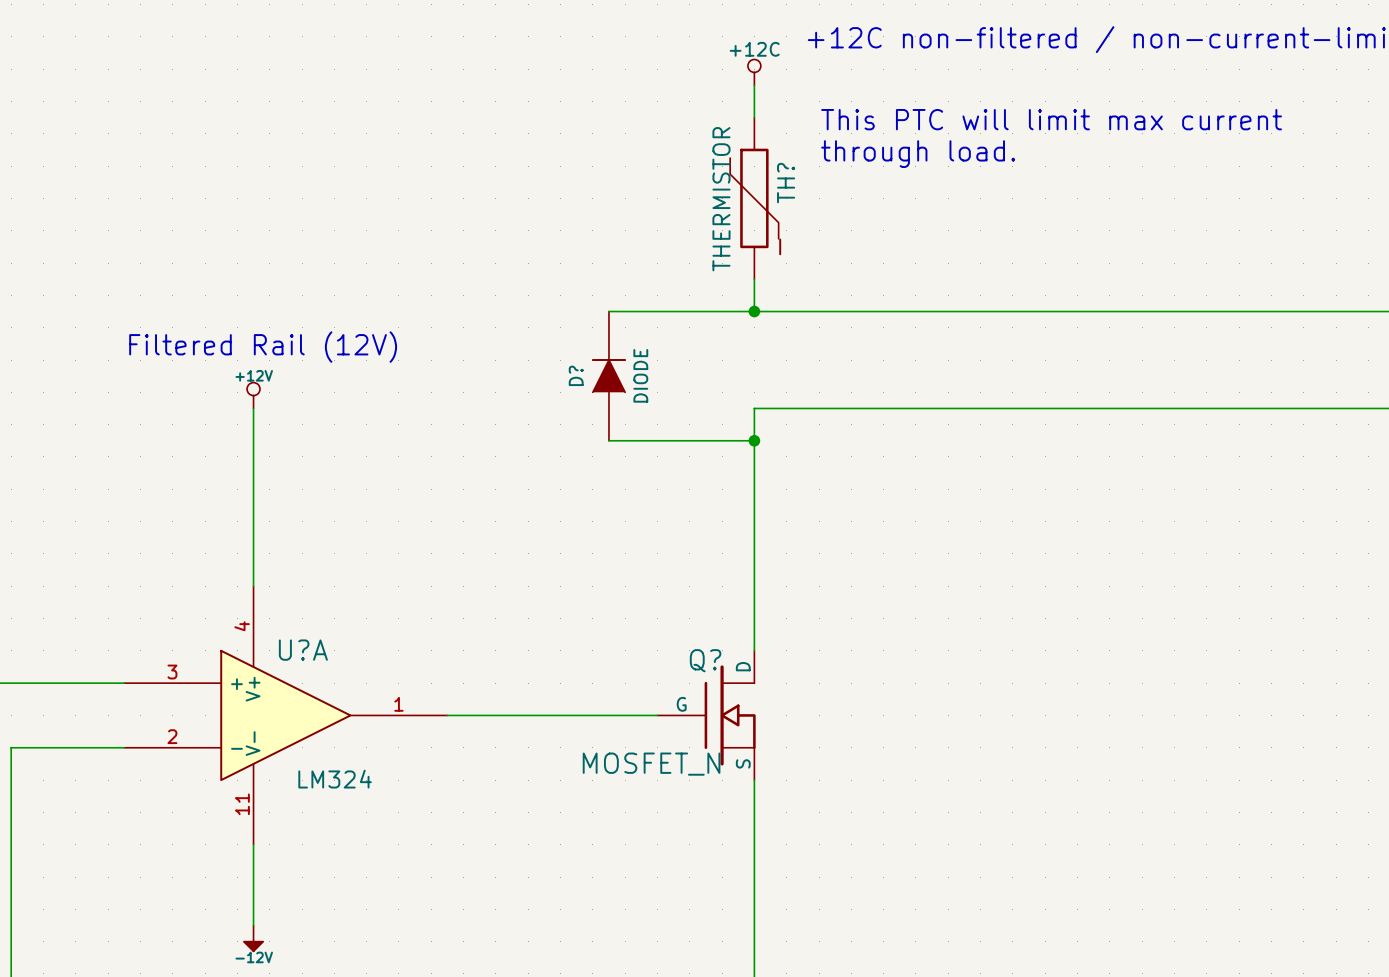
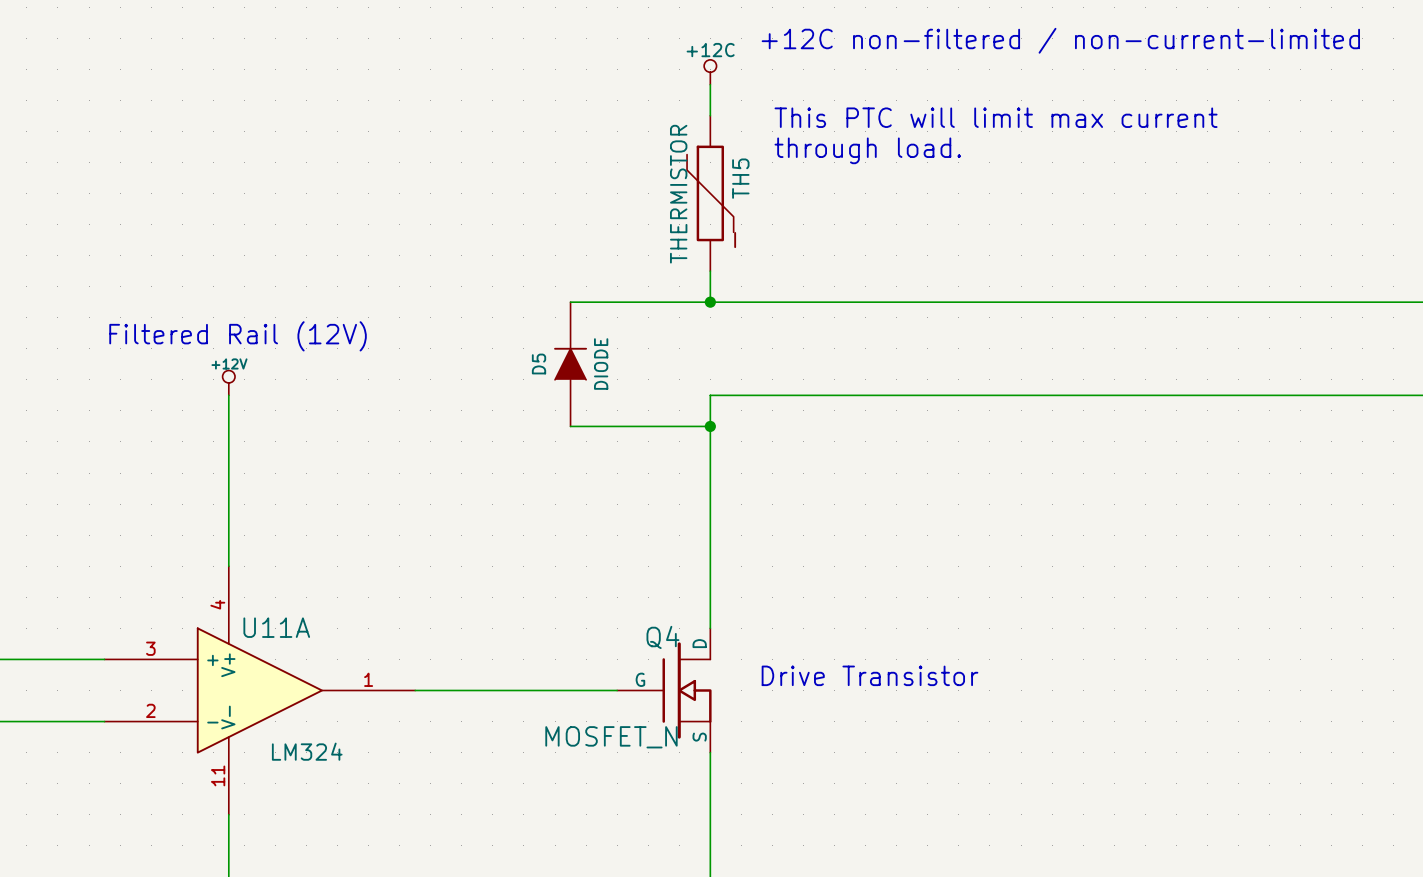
TH? name: TH? (786, 183) -> TH5 (740, 178)
D? name: D? (576, 375) -> D5 (539, 364)
U?A name: U?A (303, 650) -> U11A (276, 627)
Q? name: Q? (705, 660) -> Q4 (662, 637)
text: none -> Drive Transistor (870, 675)

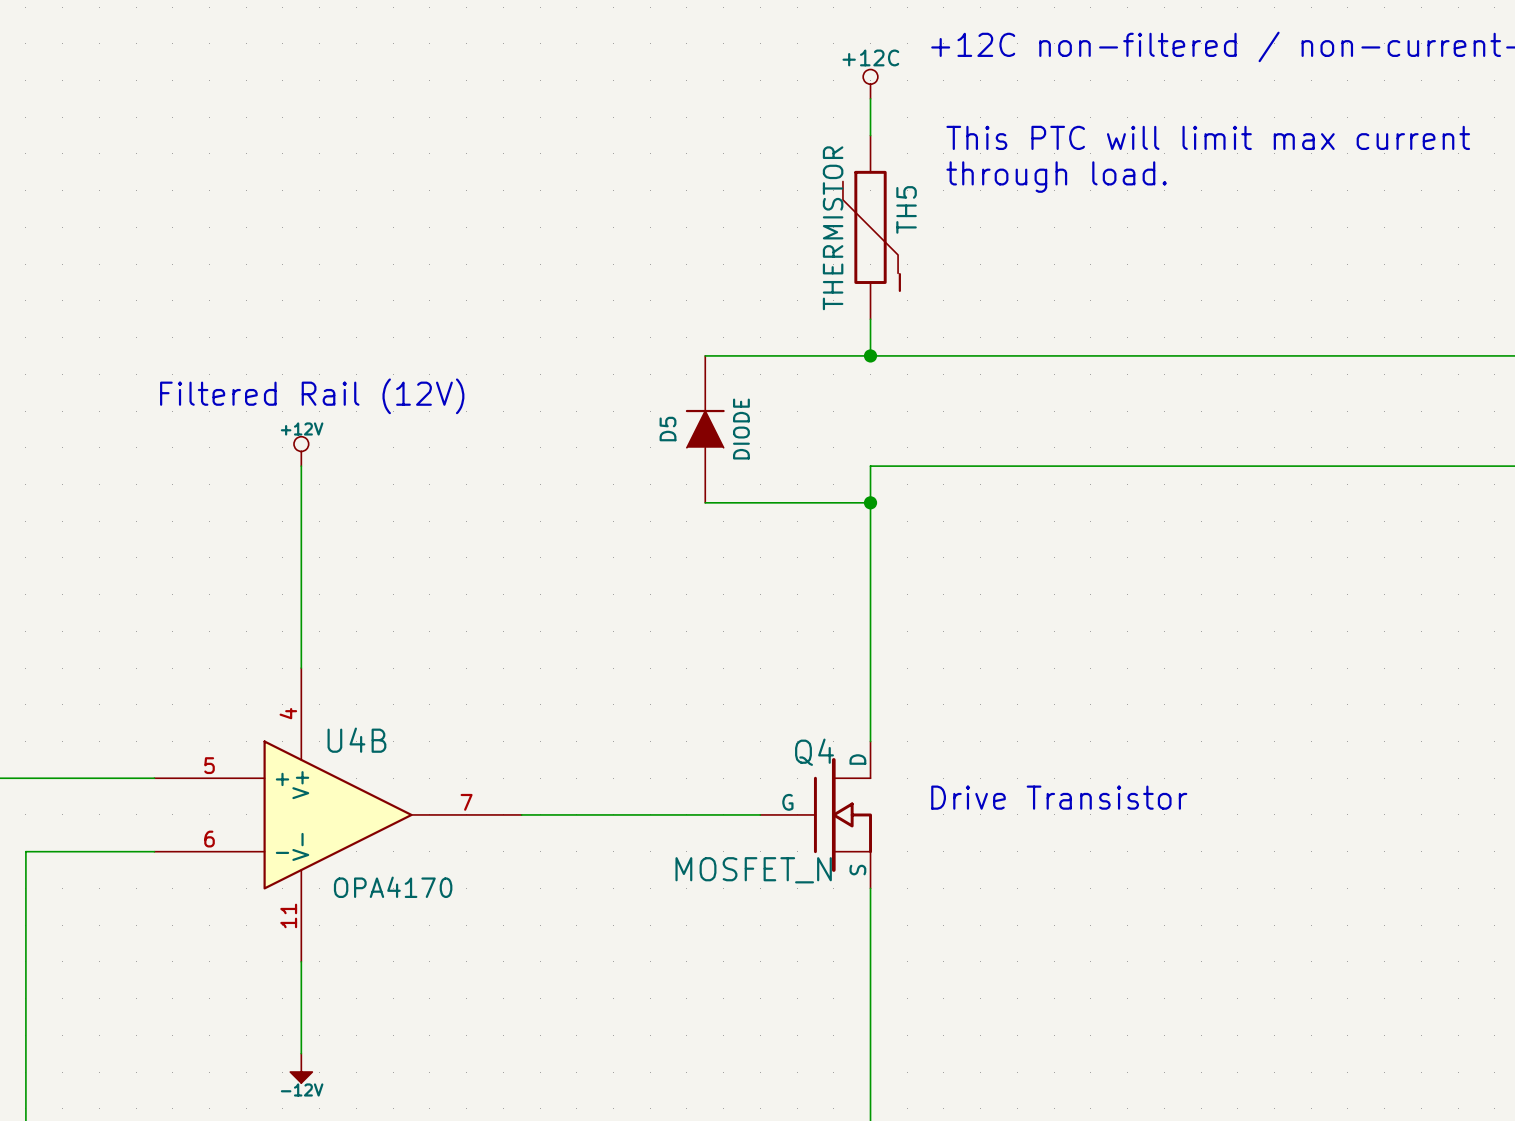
U11A name: U11A (276, 627) -> U4B (356, 740)
U11A pin number: 3 (150, 648) -> 5 (209, 765)
U11A pin number: 1 (368, 679) -> 7 (466, 802)
U11A pin number: 2 (150, 710) -> 6 (209, 839)
U11A value: LM324 (307, 751) -> OPA4170 (393, 887)

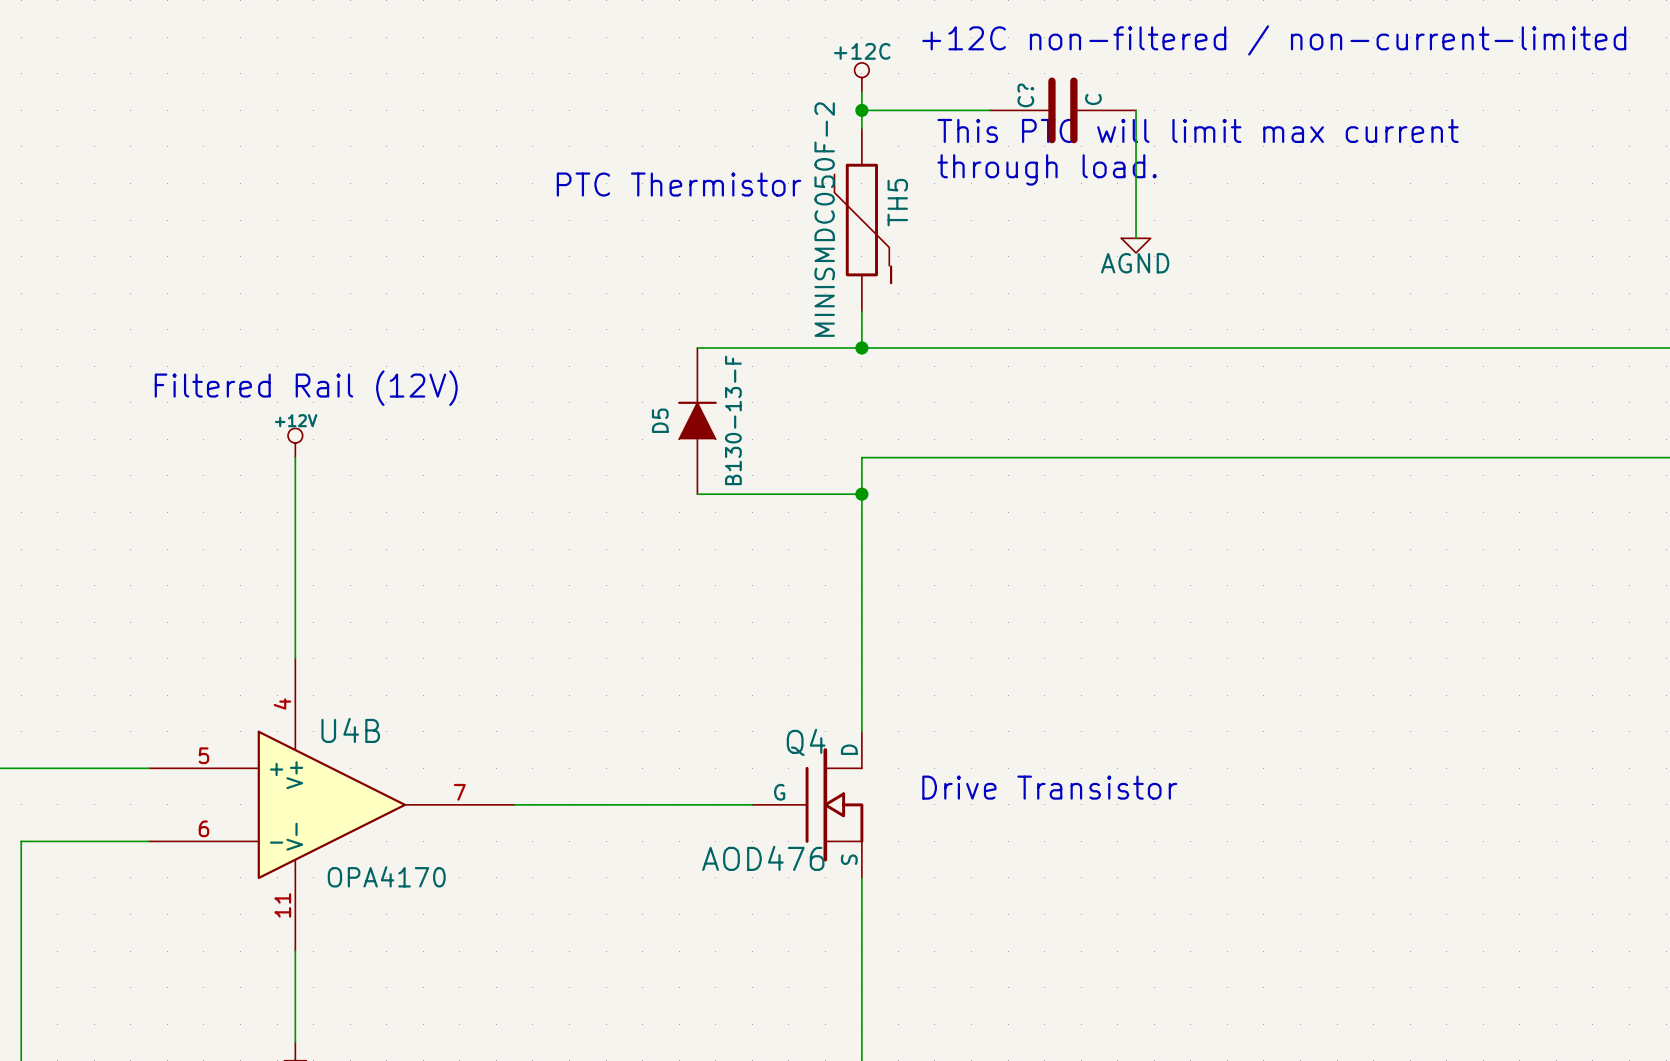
wire: none -> (861, 110) (989, 110)
junction: none -> (861, 110)
C?: none -> C (1062, 110)
wire: none -> (1136, 110) (1136, 238)
text: none -> PTC Thermistor (679, 184)
TH5 value: THERMISTOR (833, 228) -> MINISMDC050F-2 (824, 219)
power symbol: none -> AGND (1136, 245)
D5 value: DIODE (741, 429) -> B130-13-F (733, 420)
Q4 value: MOSFET_N (753, 870) -> AOD476 (763, 858)

